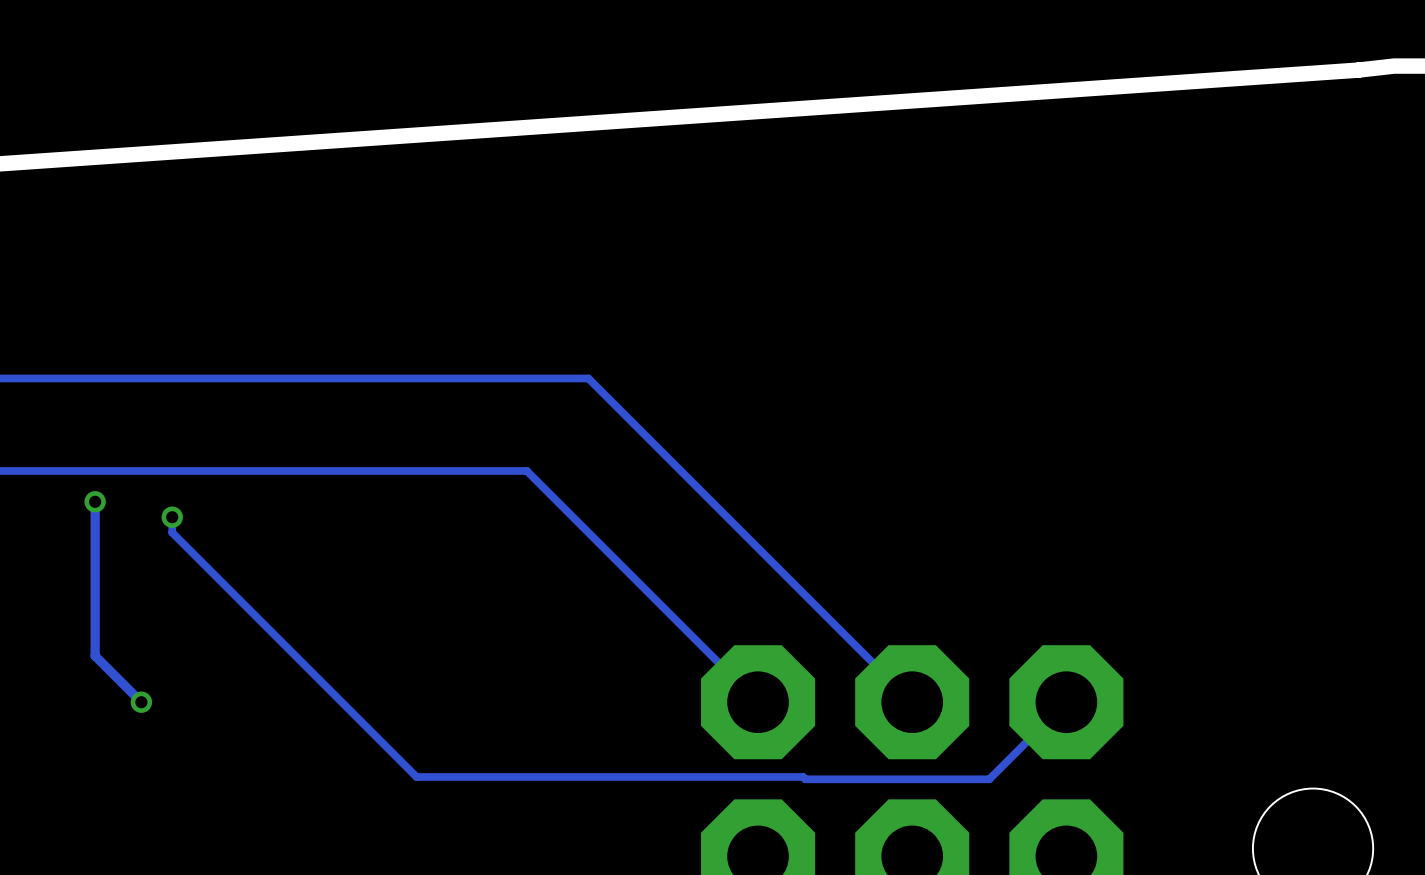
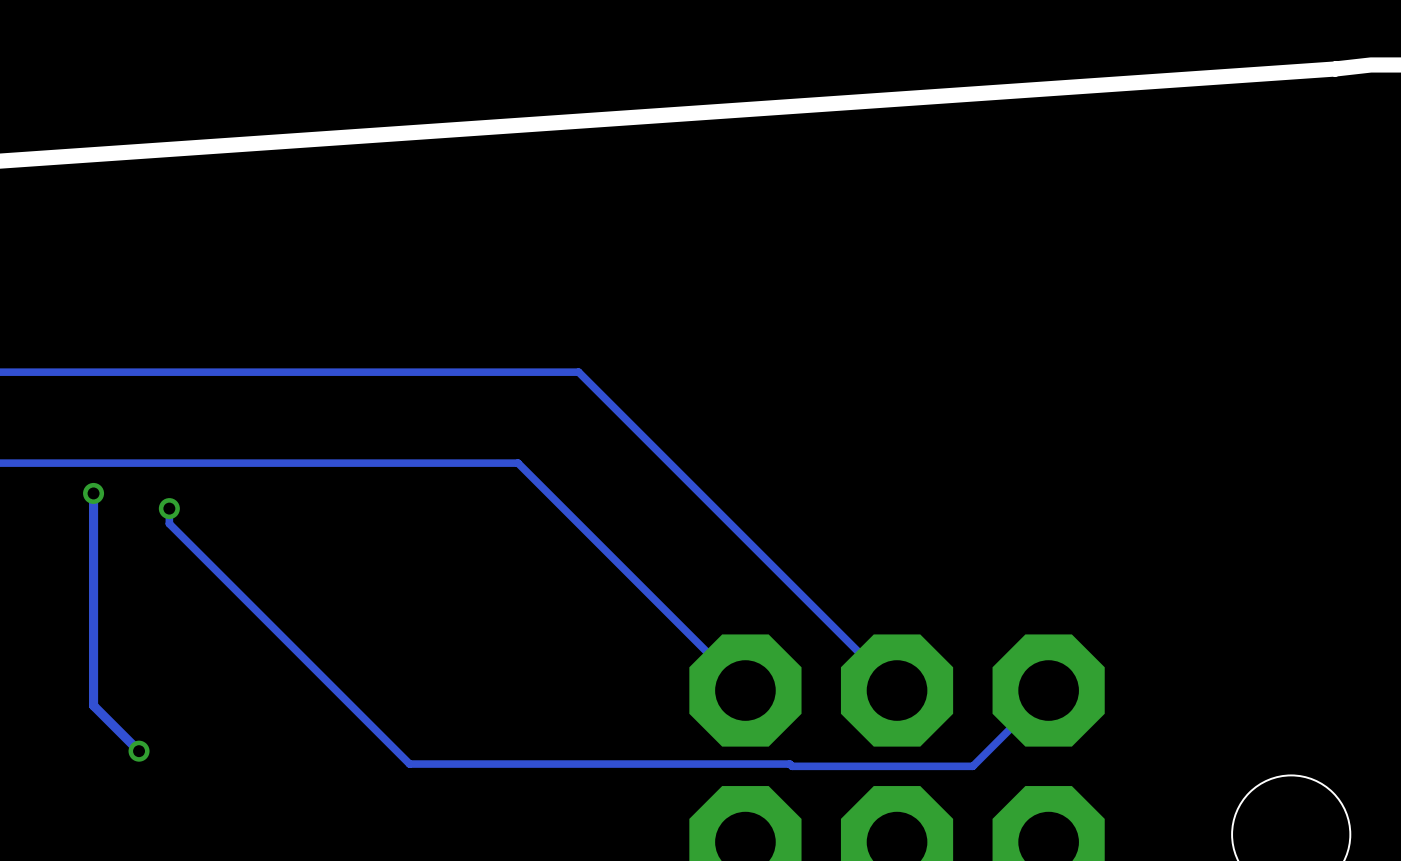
track: (95, 655) (141, 702) -> (93, 645) (93, 705) (139, 751)
via position: (141, 702) -> (139, 751)

